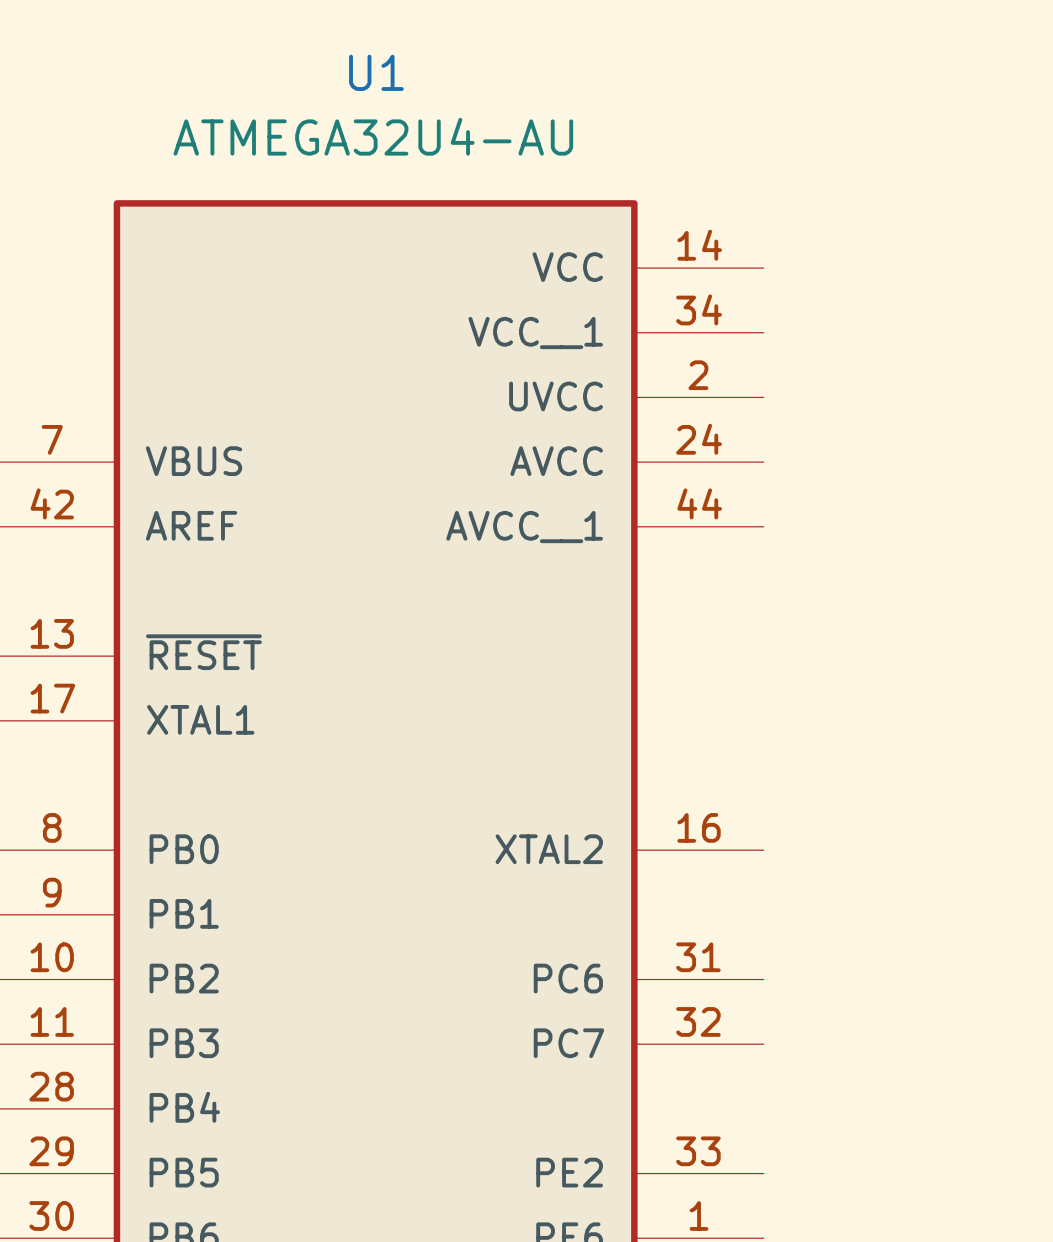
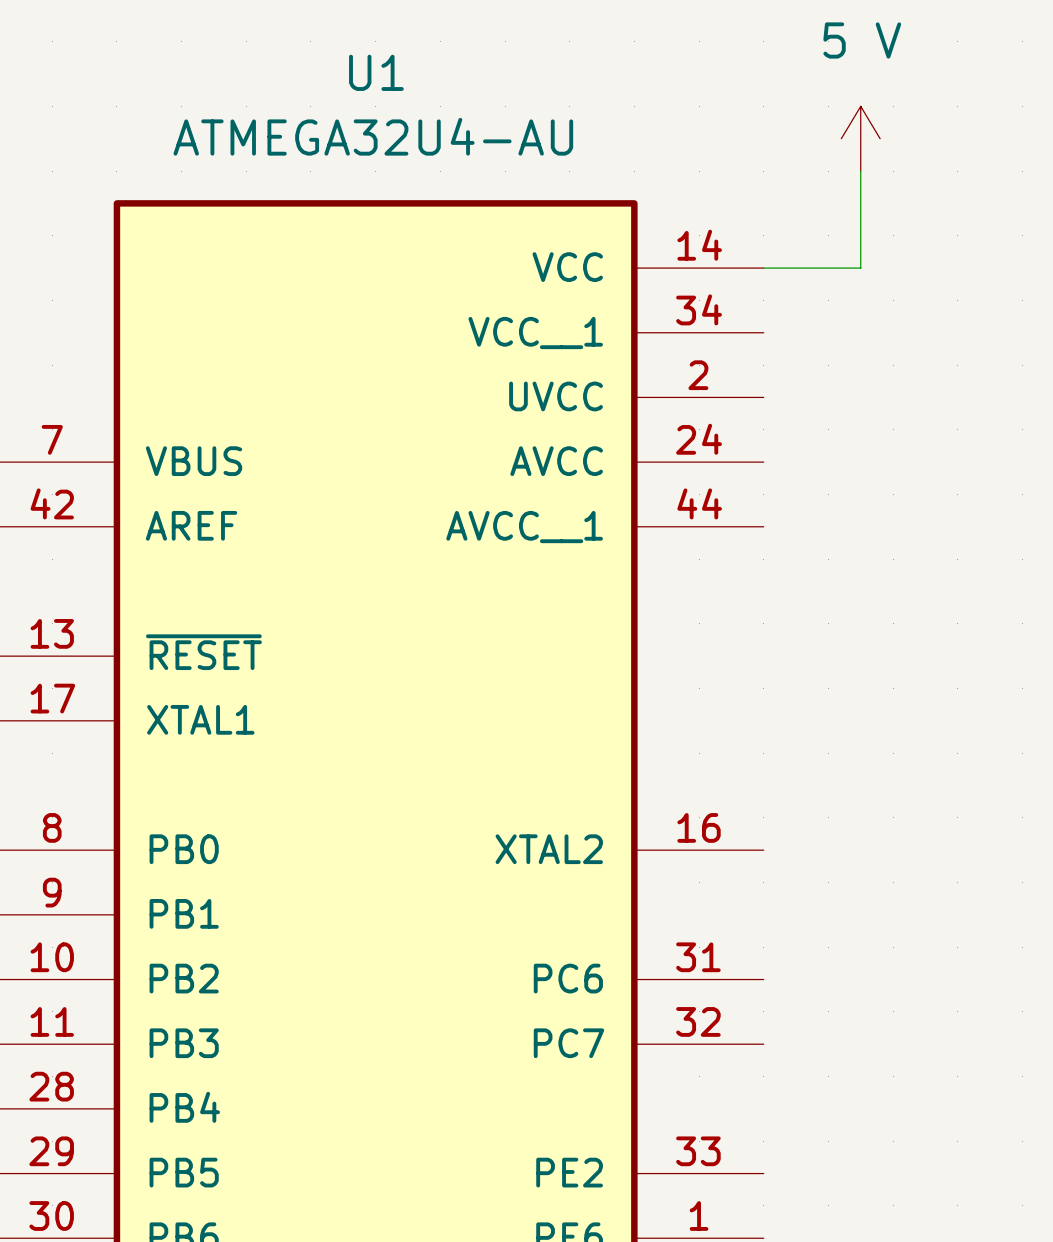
power symbol: none -> 5 V (860, 138)
wire: none -> (860, 171) (860, 268) (763, 268)

